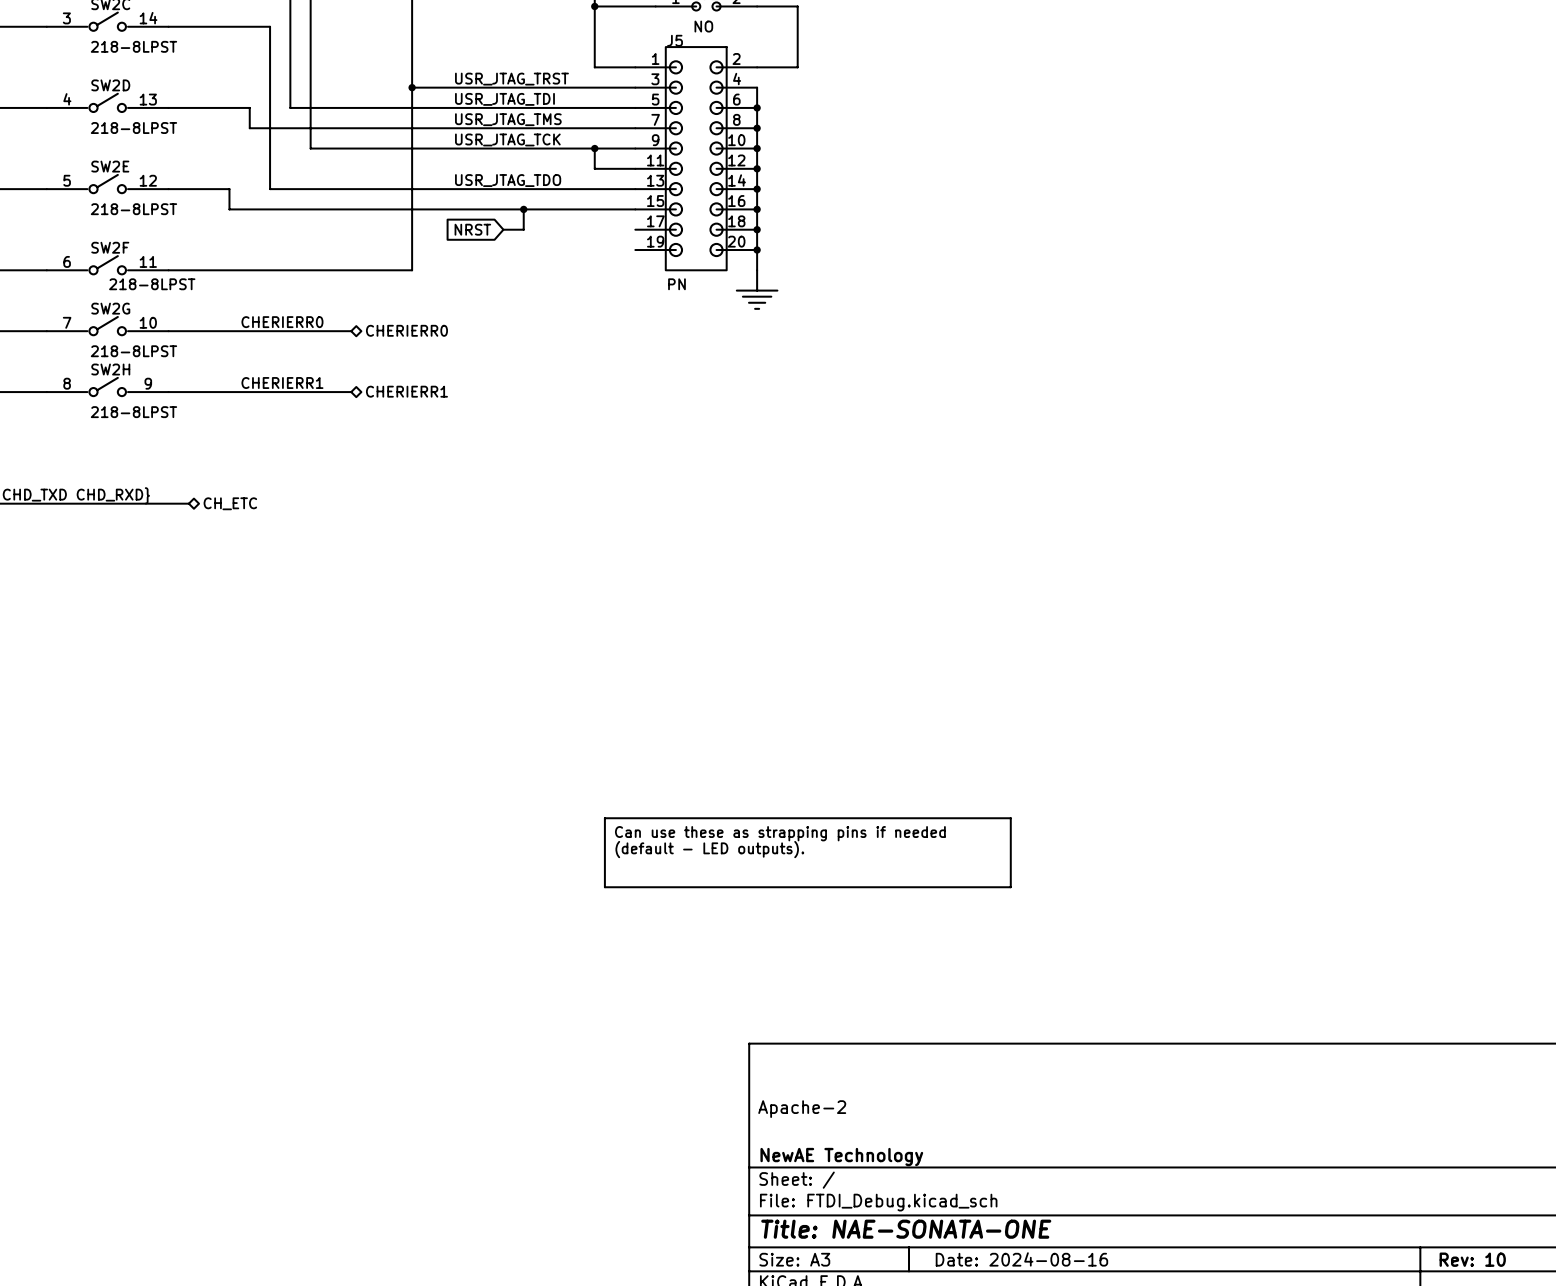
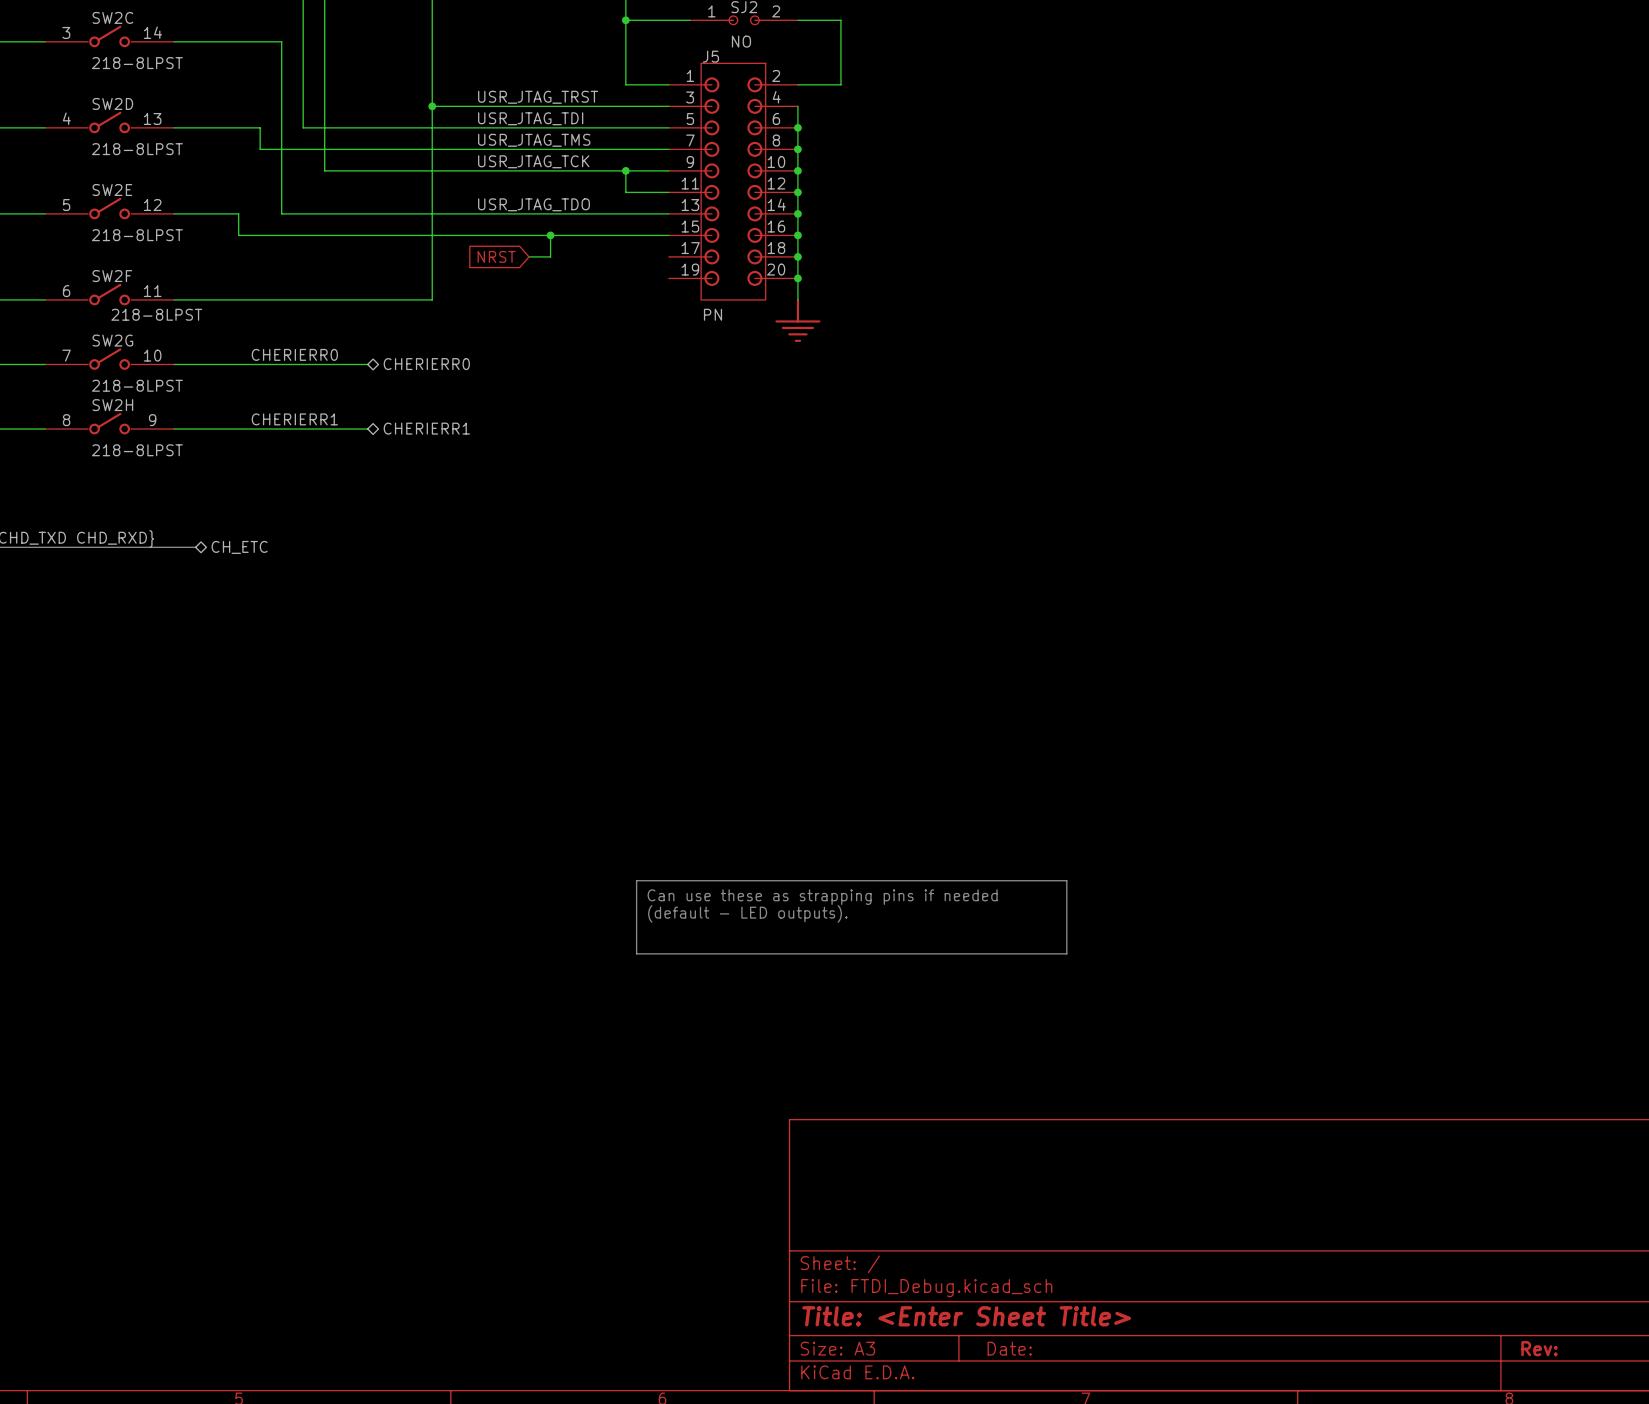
title block: Apache-2 (802, 1109) -> none
title block: NewAE Technology (841, 1157) -> none
title block: Title: NAE-SONATA-ONE (906, 1229) -> Title: <Enter Sheet Title> (966, 1316)
title block: Date: 2024-08-16 (1021, 1259) -> Date: (1009, 1348)
title block: Rev: 10 (1472, 1259) -> Rev: (1539, 1348)

